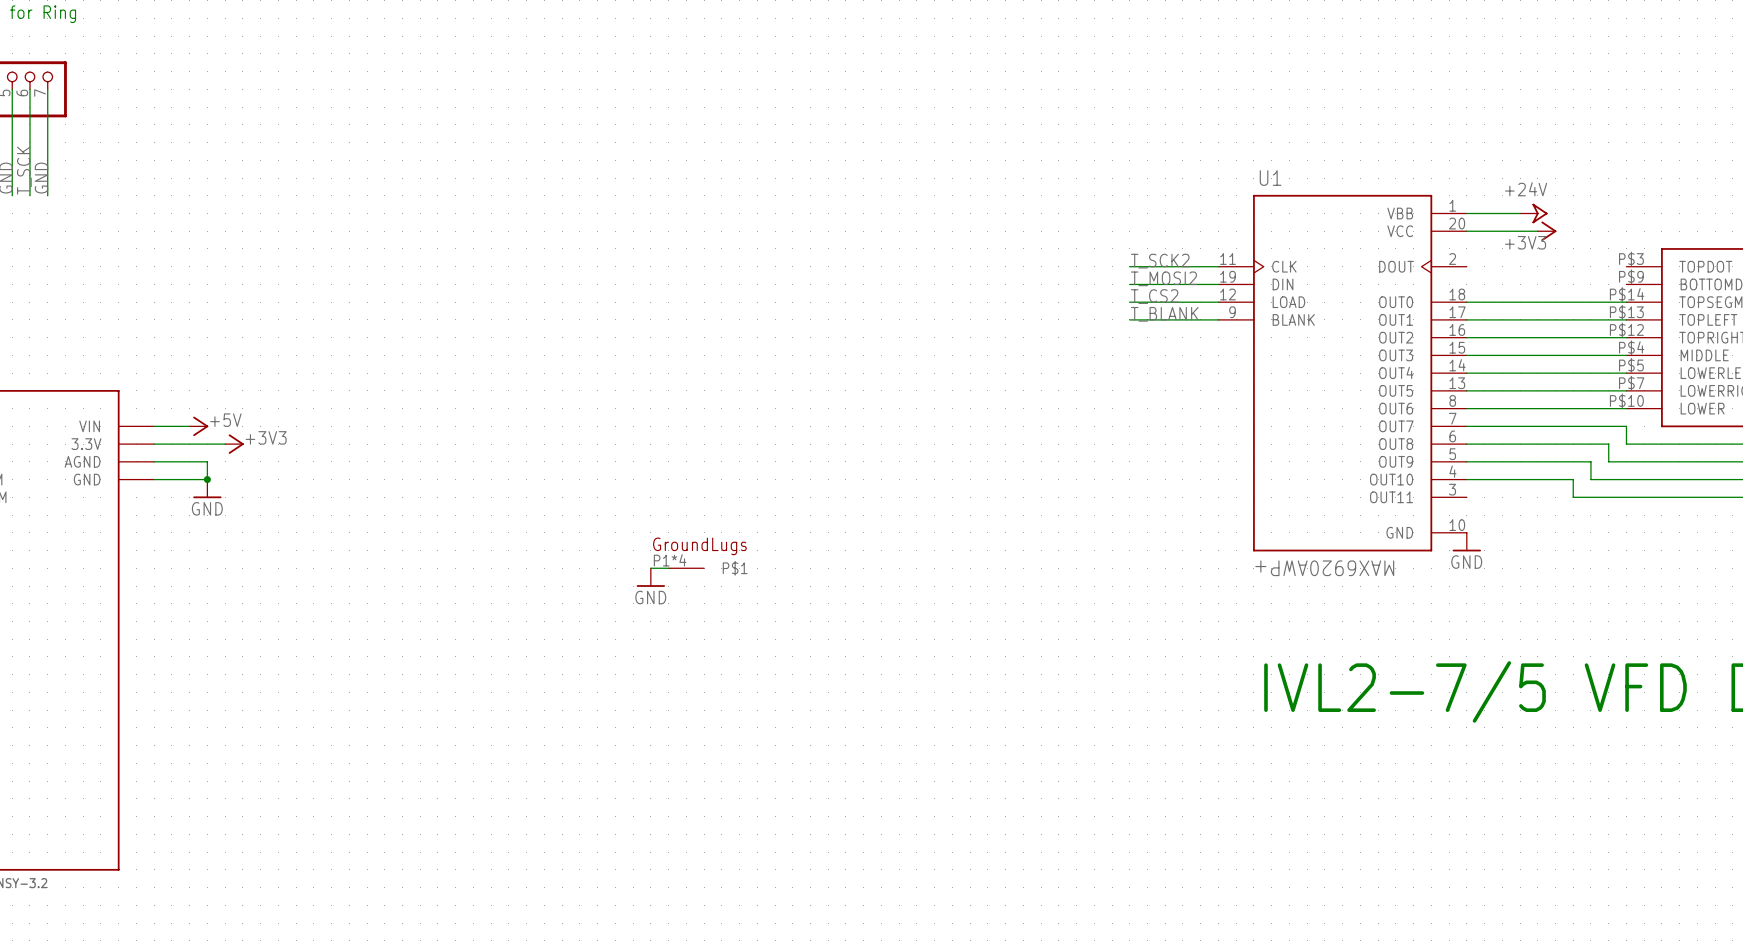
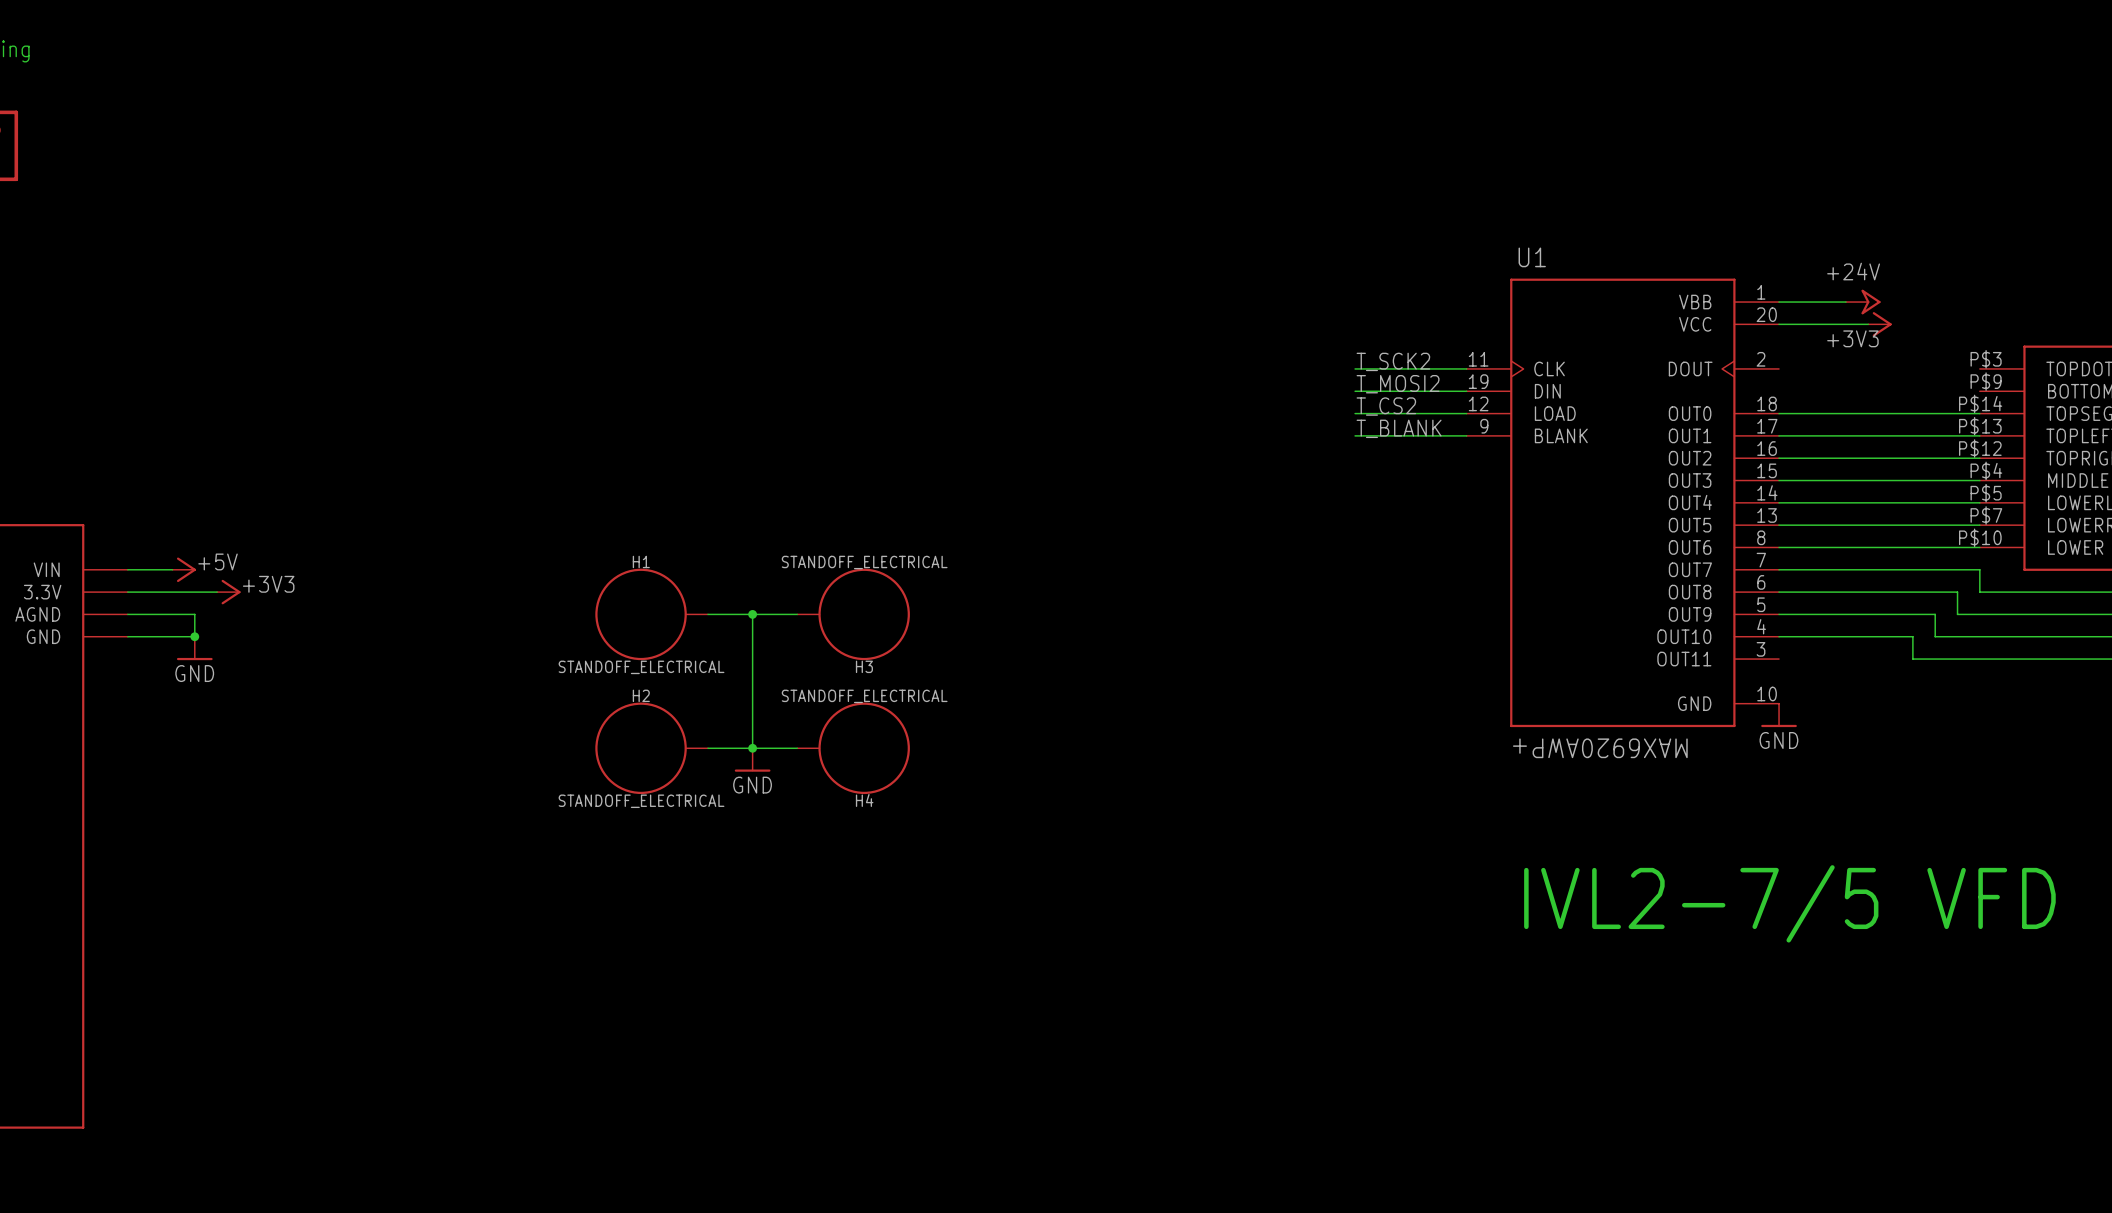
H1: none -> STANDOFF_ELECTRICAL (651, 614)
wire: none -> (707, 614) (797, 614)
wire: none -> (752, 614) (752, 748) (707, 748)
junction: none -> (752, 614)
H3: none -> STANDOFF_ELECTRICAL (853, 614)
H2: none -> STANDOFF_ELECTRICAL (651, 748)
junction: none -> (752, 748)
part: (686, 568) -> none
H4: none -> STANDOFF_ELECTRICAL (853, 748)

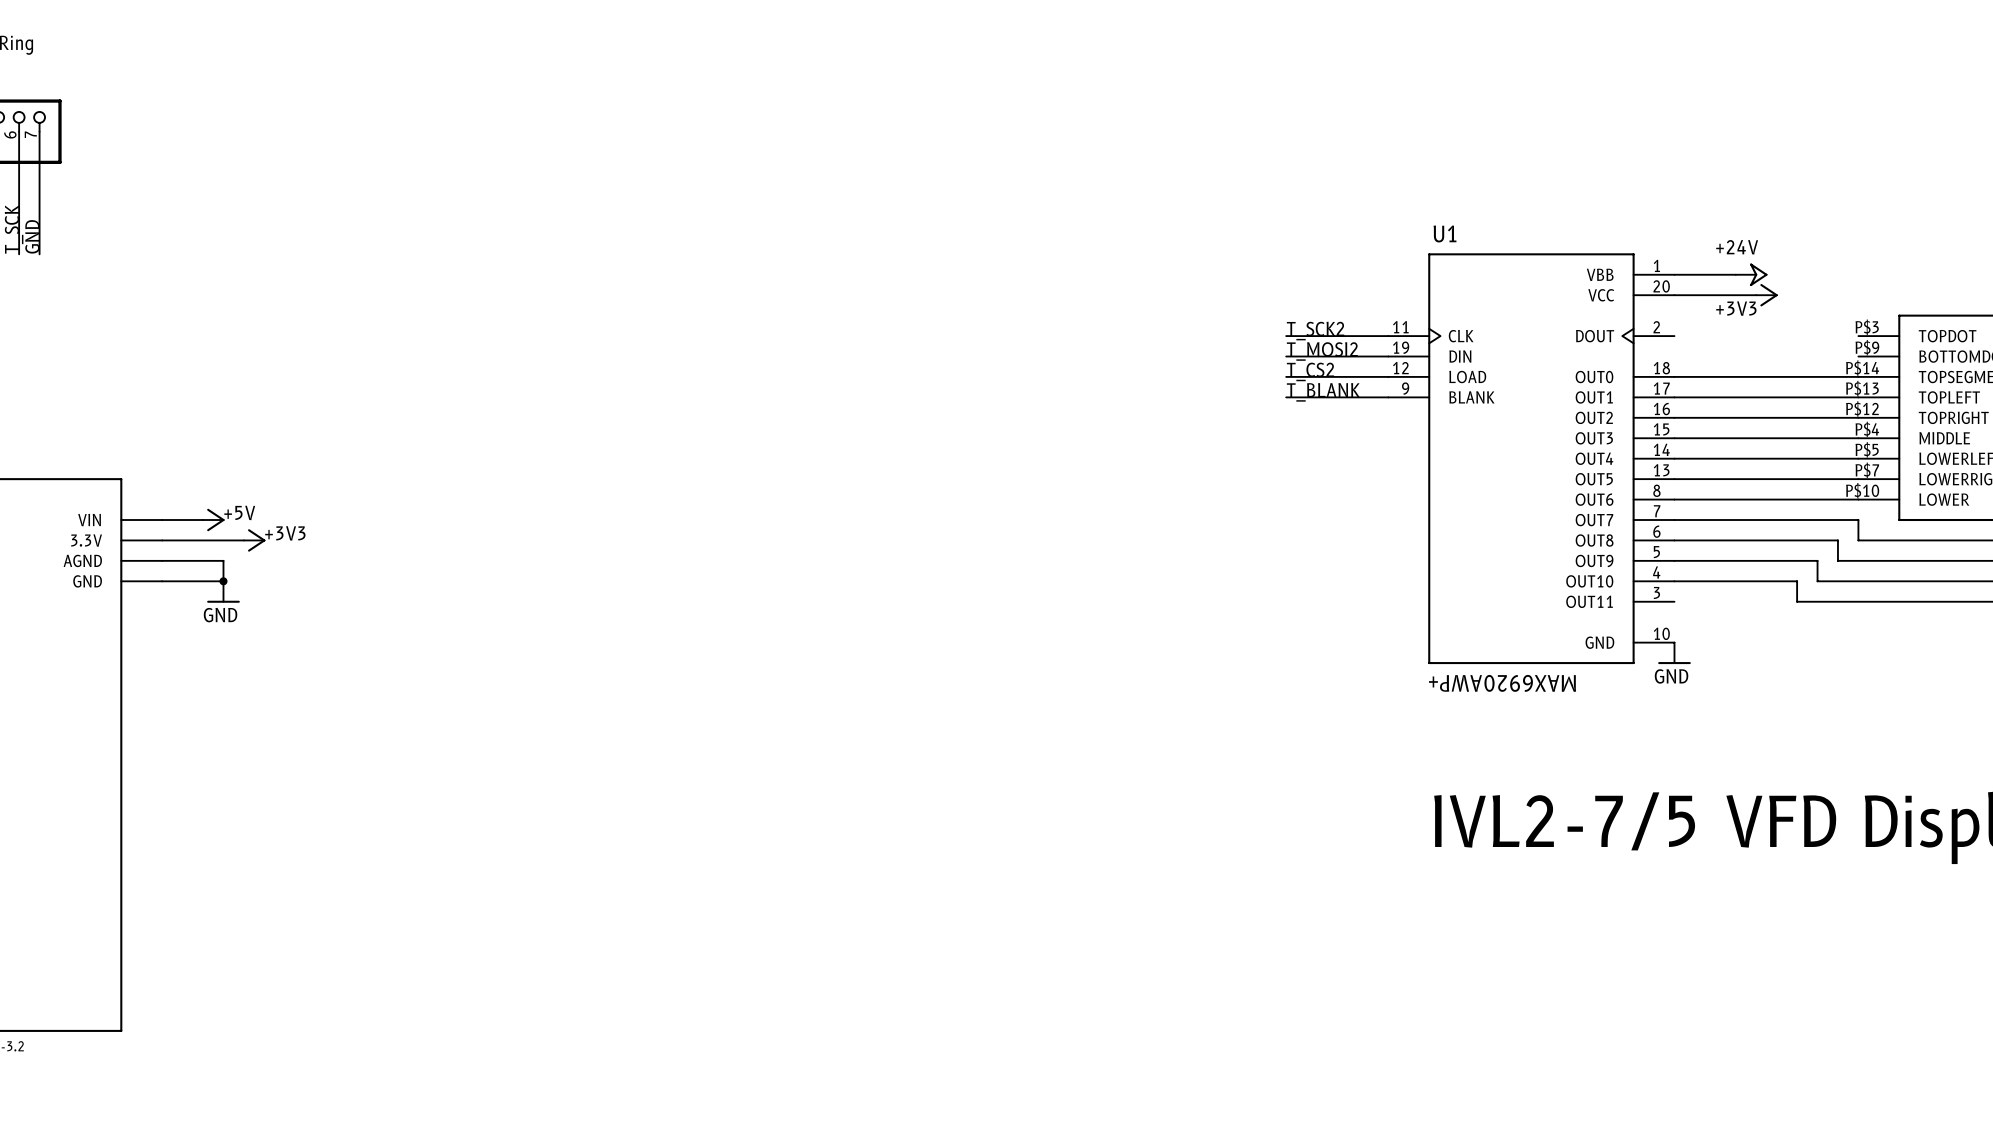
H1: STANDOFF_ELECTRICAL (651, 614) -> none
wire: (707, 614) (797, 614) -> none
wire: (752, 614) (752, 748) -> none
junction: (752, 614) -> none
H3: STANDOFF_ELECTRICAL (853, 614) -> none
H2: STANDOFF_ELECTRICAL (651, 748) -> none
wire: (707, 748) (797, 748) -> none
junction: (752, 748) -> none
H4: STANDOFF_ELECTRICAL (853, 748) -> none
power symbol: GND (752, 760) -> none

